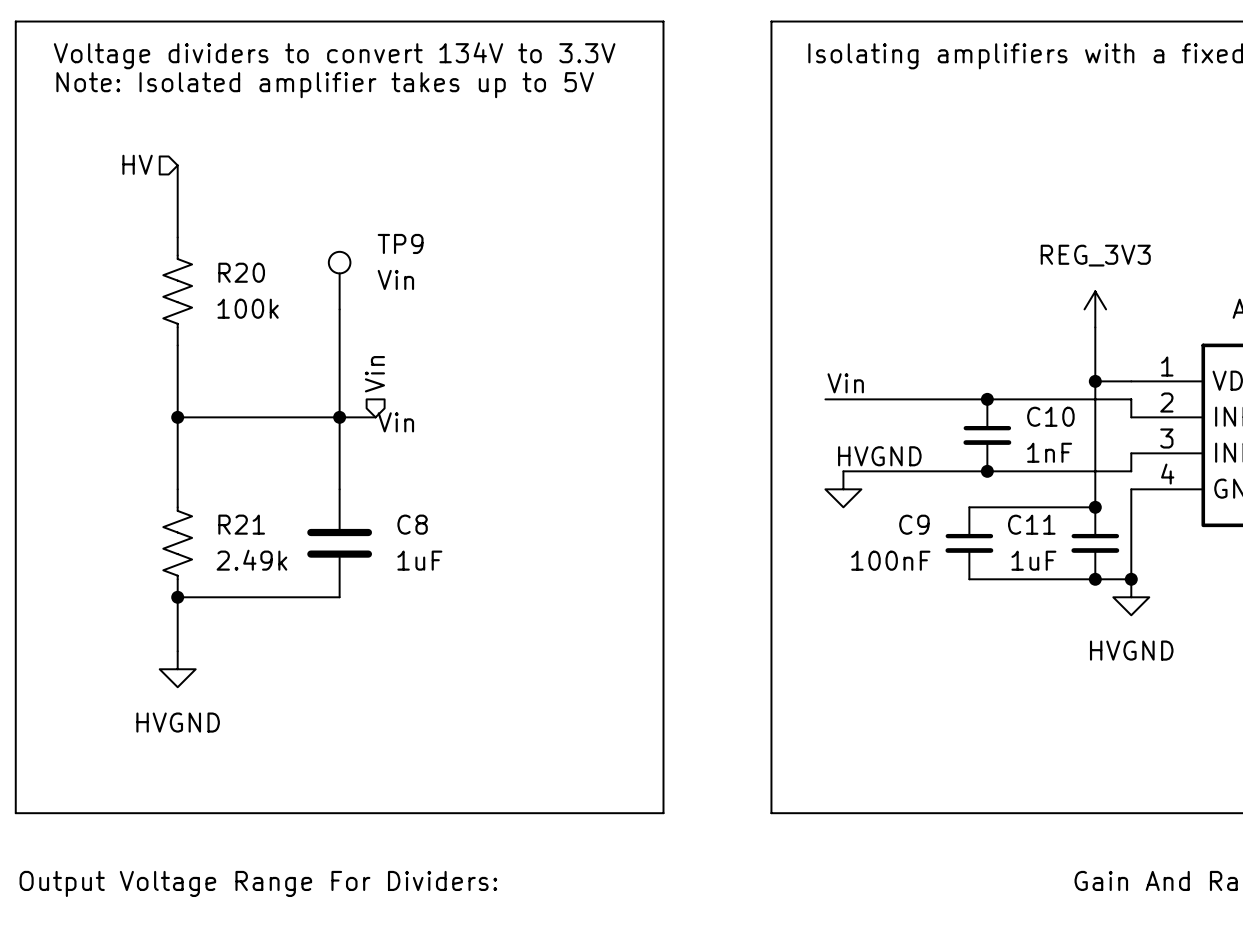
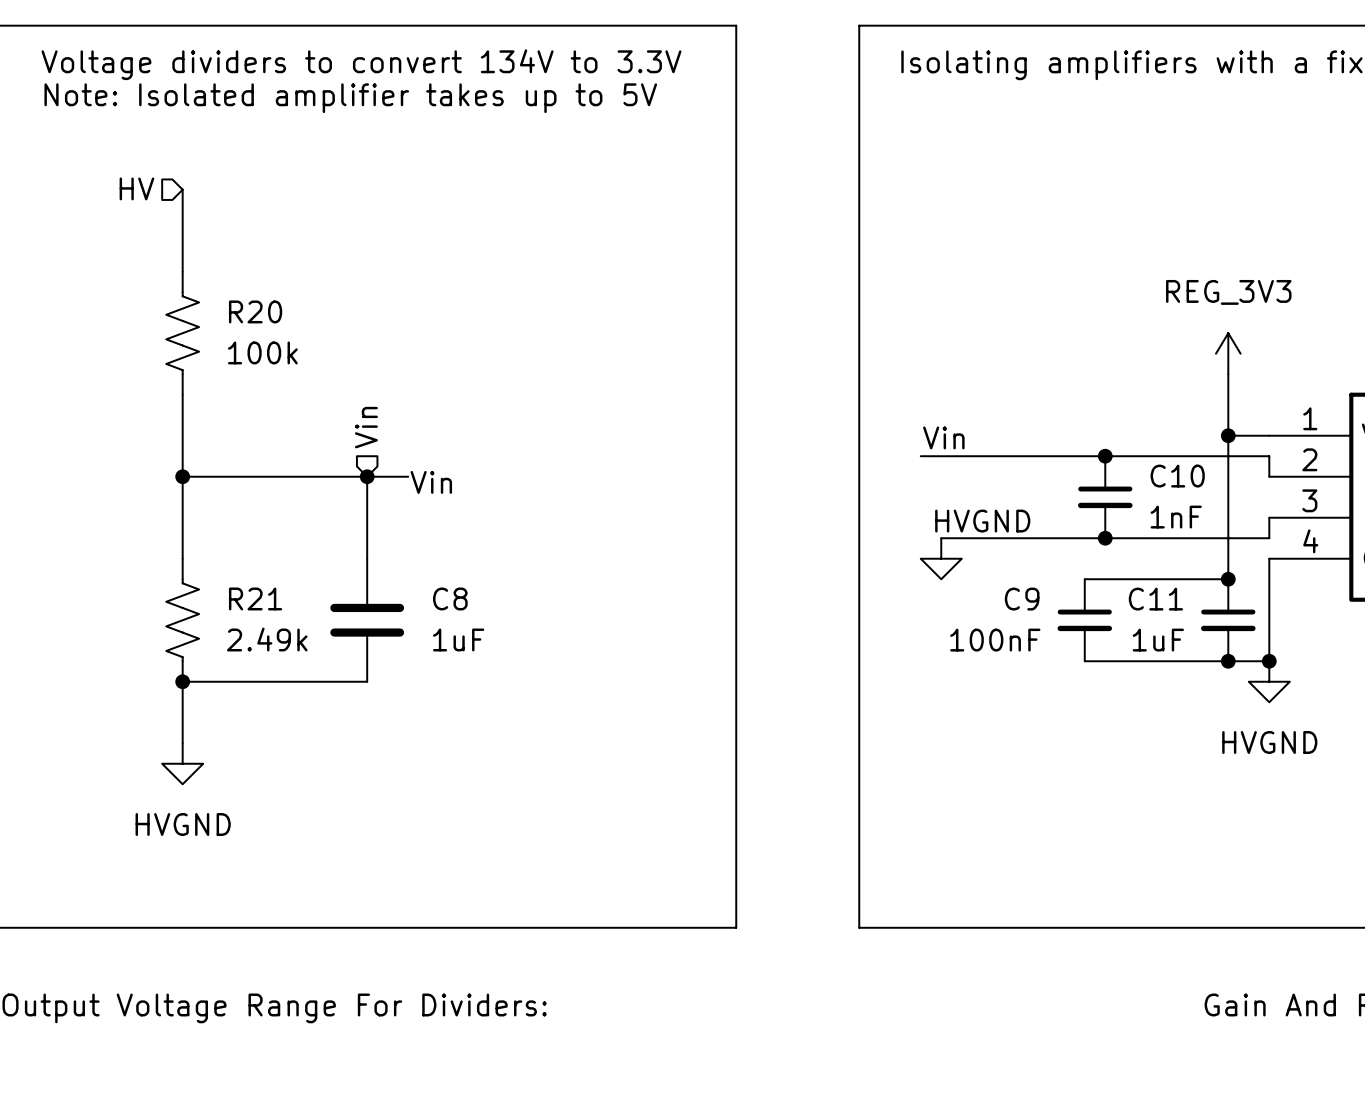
TP9: Vin (339, 280) -> none
wire: (339, 309) (339, 417) -> none
hierarchical label position: Vin (374, 374) -> Vin (366, 427)

